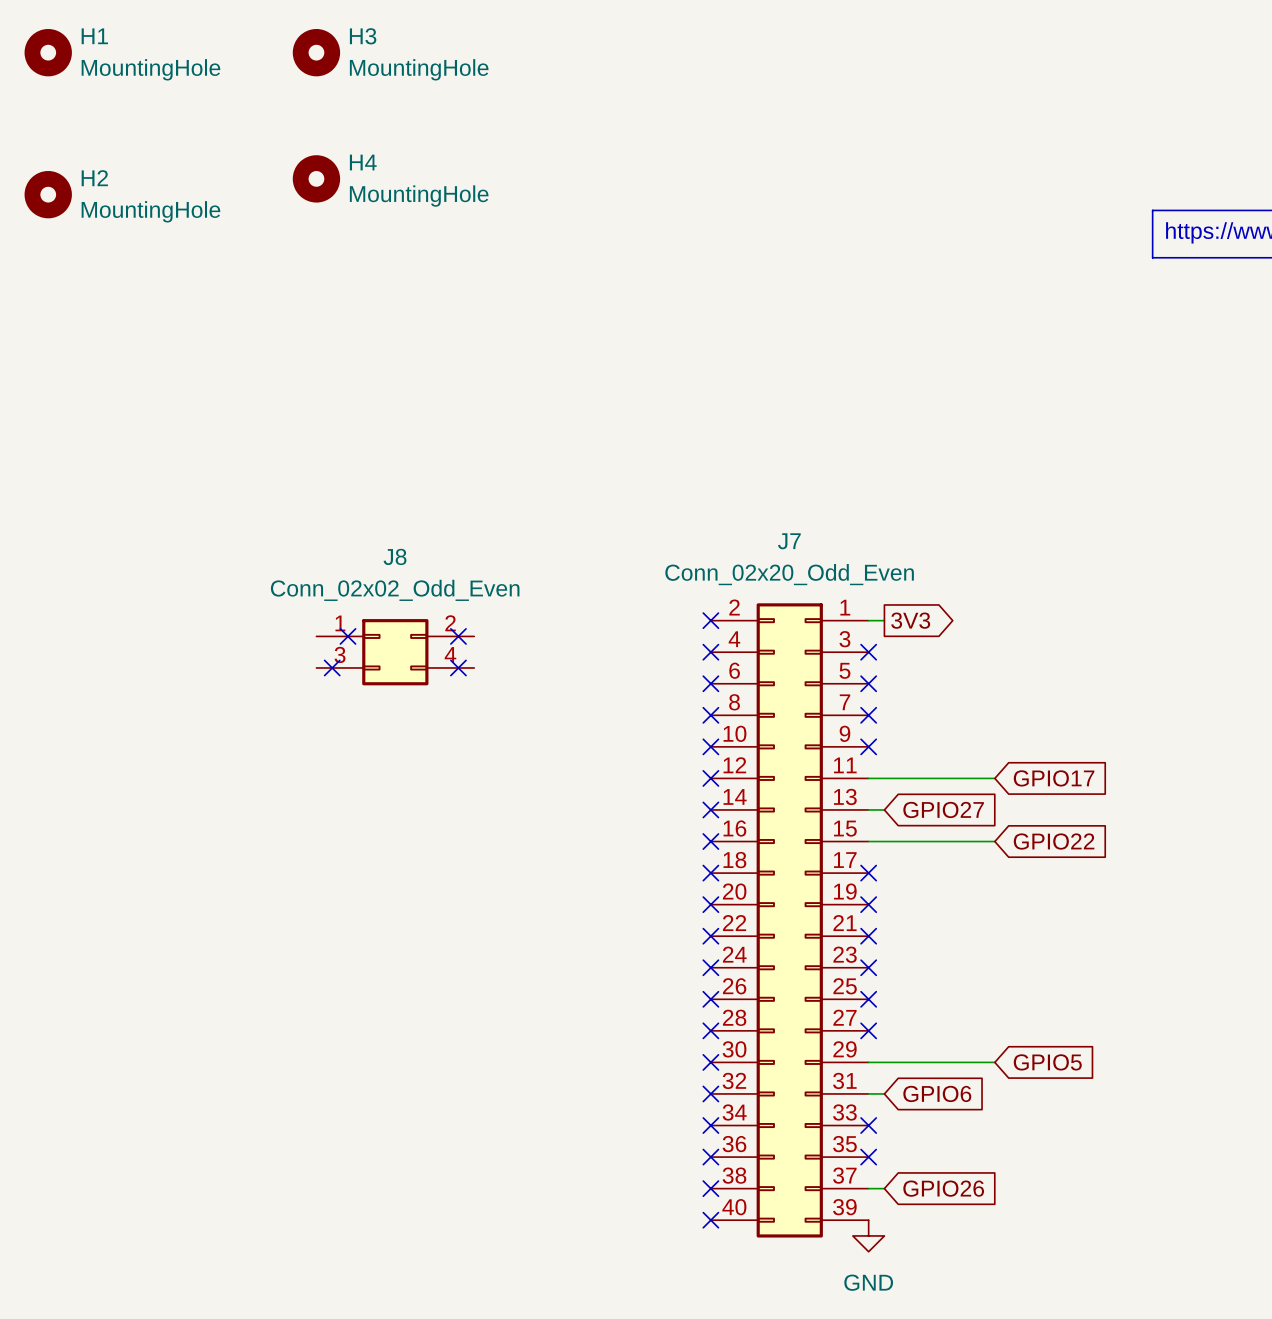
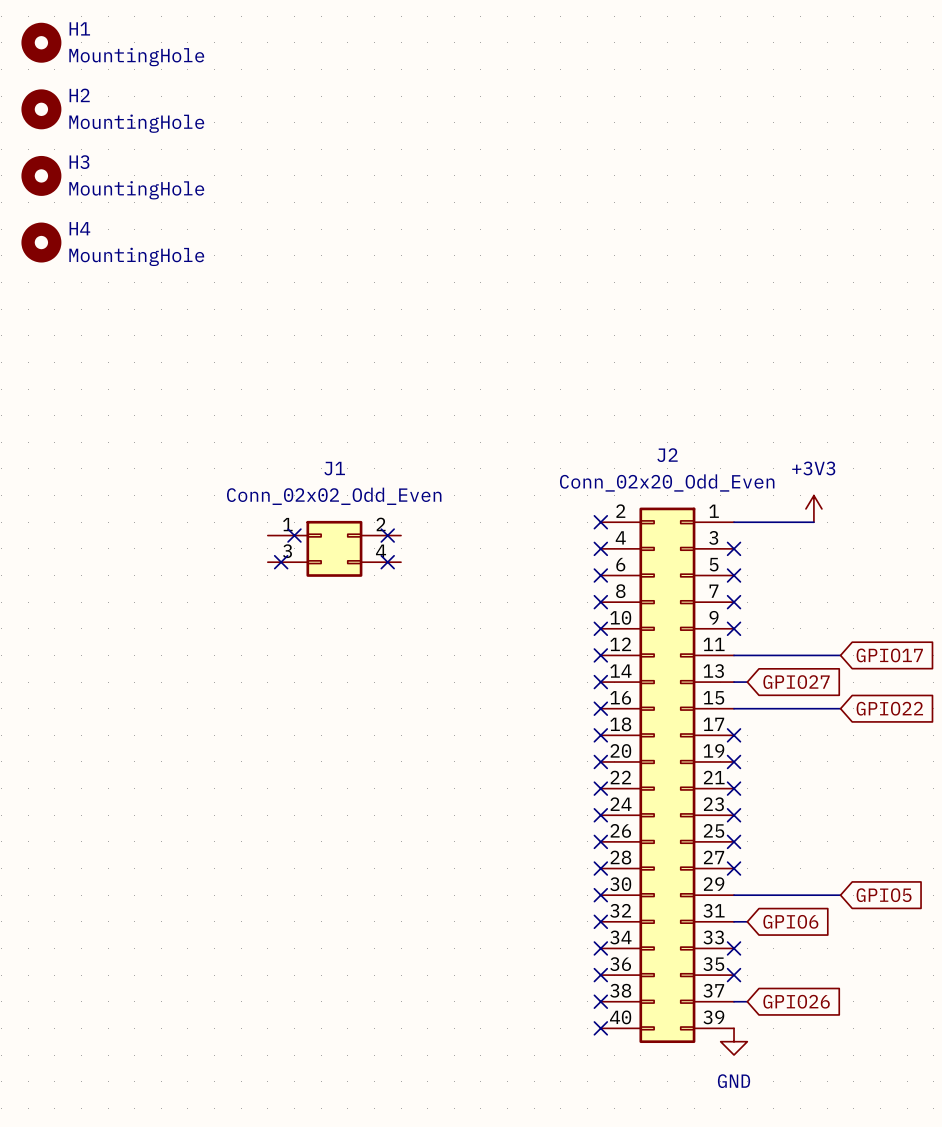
H3 position: (316, 52) -> (41, 175)
H4 position: (316, 178) -> (41, 242)
H2 position: (48, 194) -> (41, 109)
J7 name: J7 (789, 541) -> J2 (667, 455)
J8 name: J8 (395, 556) -> J1 (334, 468)
power symbol: none -> +3V3 (813, 508)
wire: none -> (747, 522) (813, 522)
global label: 3V3 (910, 620) -> none

